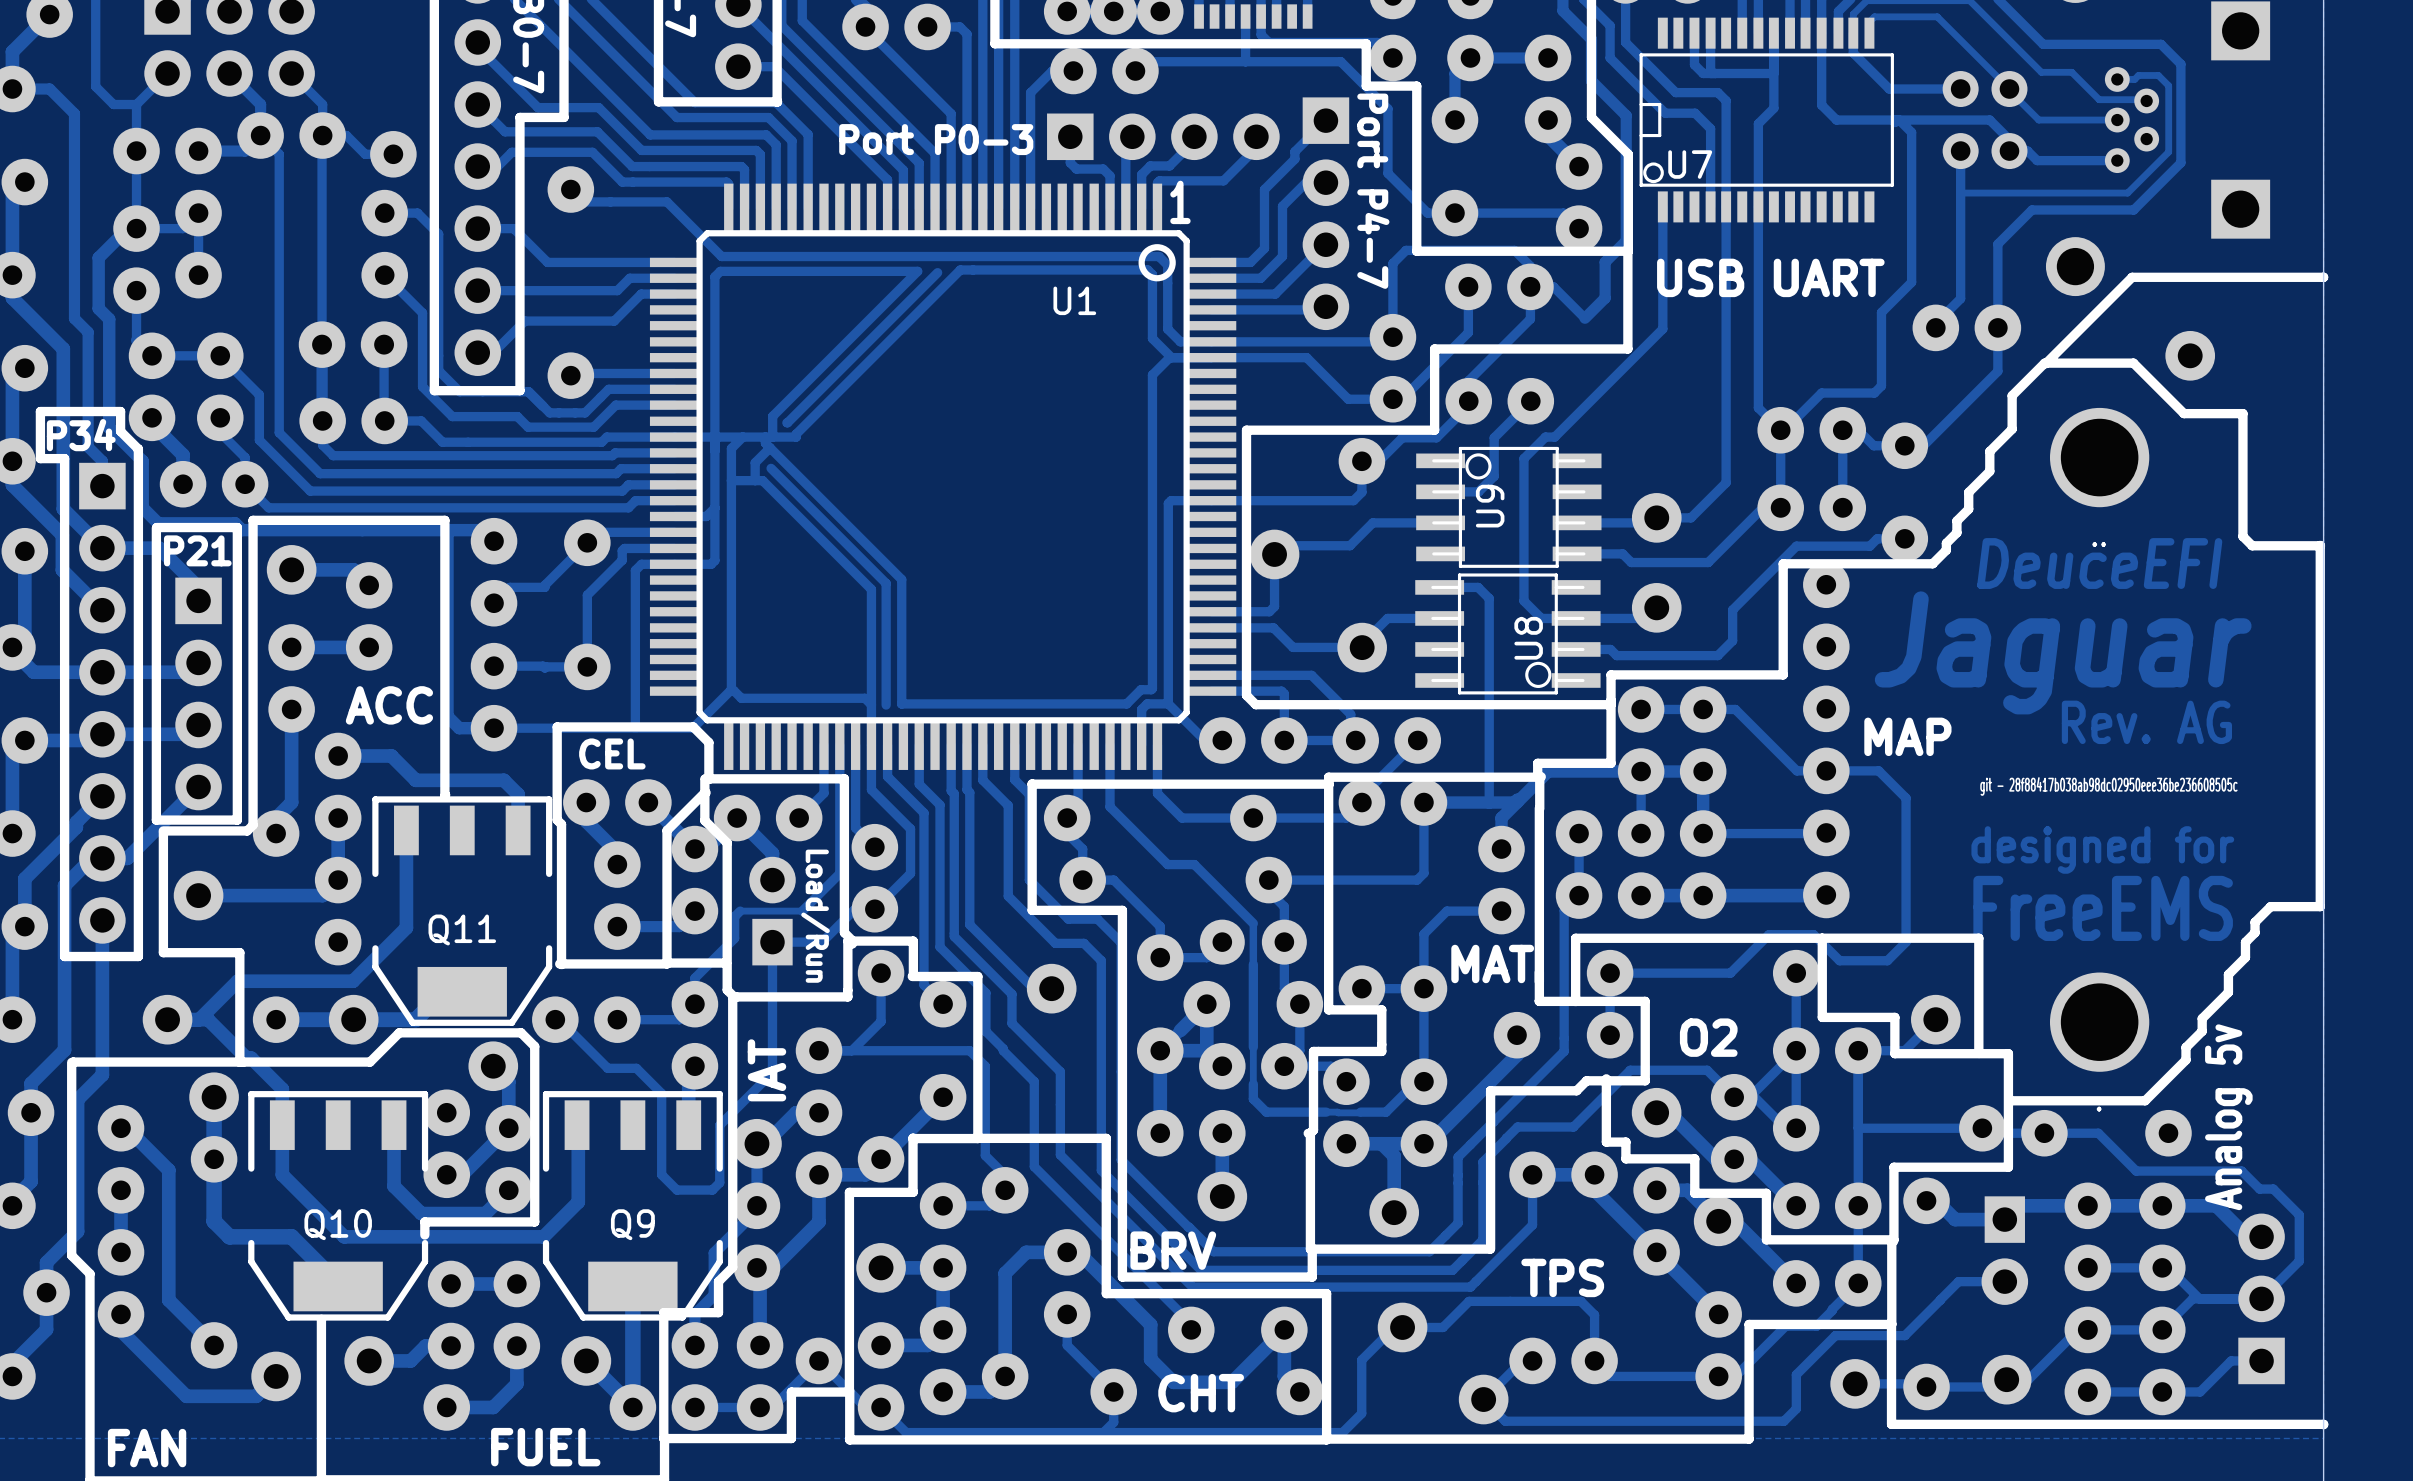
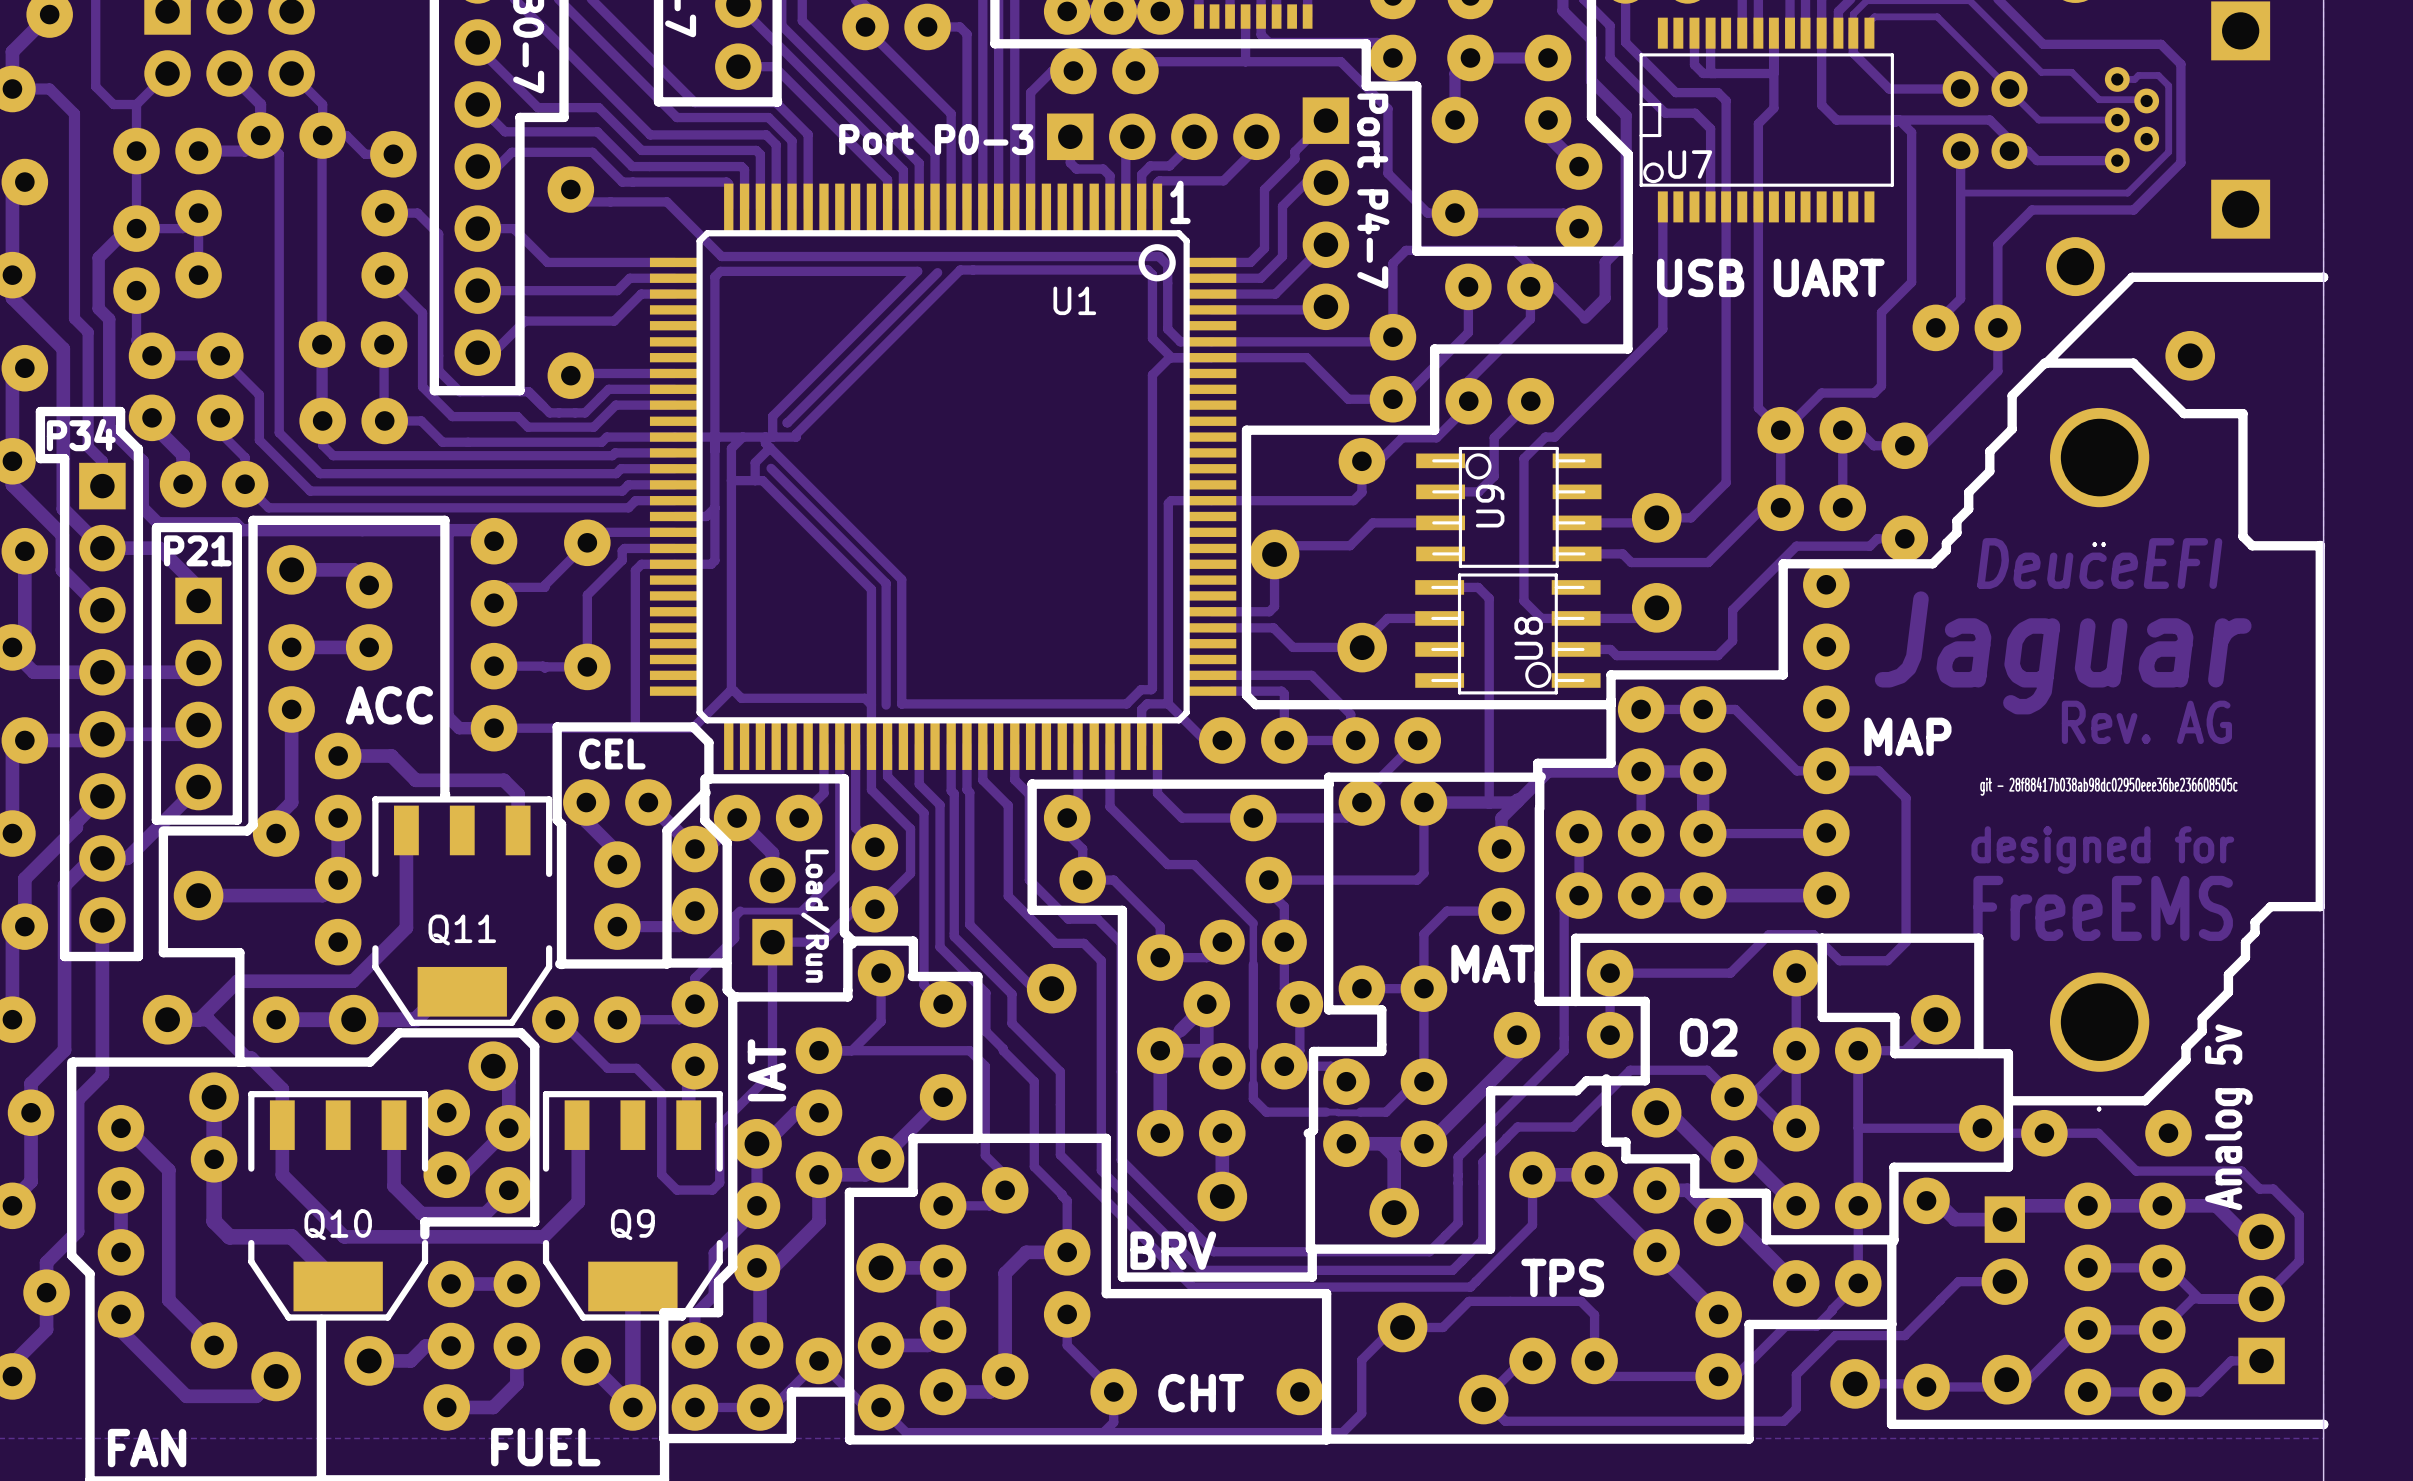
track: (1062, 1194) (1191, 1323) (1191, 1329) -> (1062, 1194) (1067, 1200) (1067, 1252)
track: (1067, 1252) (1078, 1252) (1150, 1324) (1150, 1359) (1173, 1382) (1231, 1382) (1284, 1329) (1284, 1376) -> none
part: (1237, 1329) -> none

